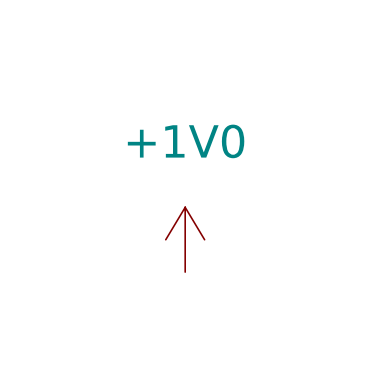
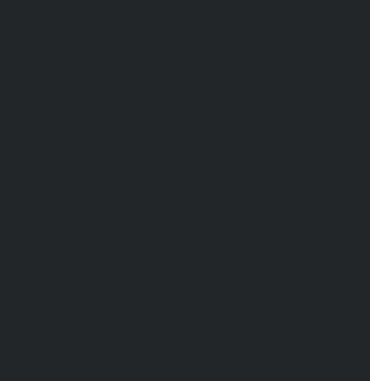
power symbol: +1V0 (185, 239) -> none

